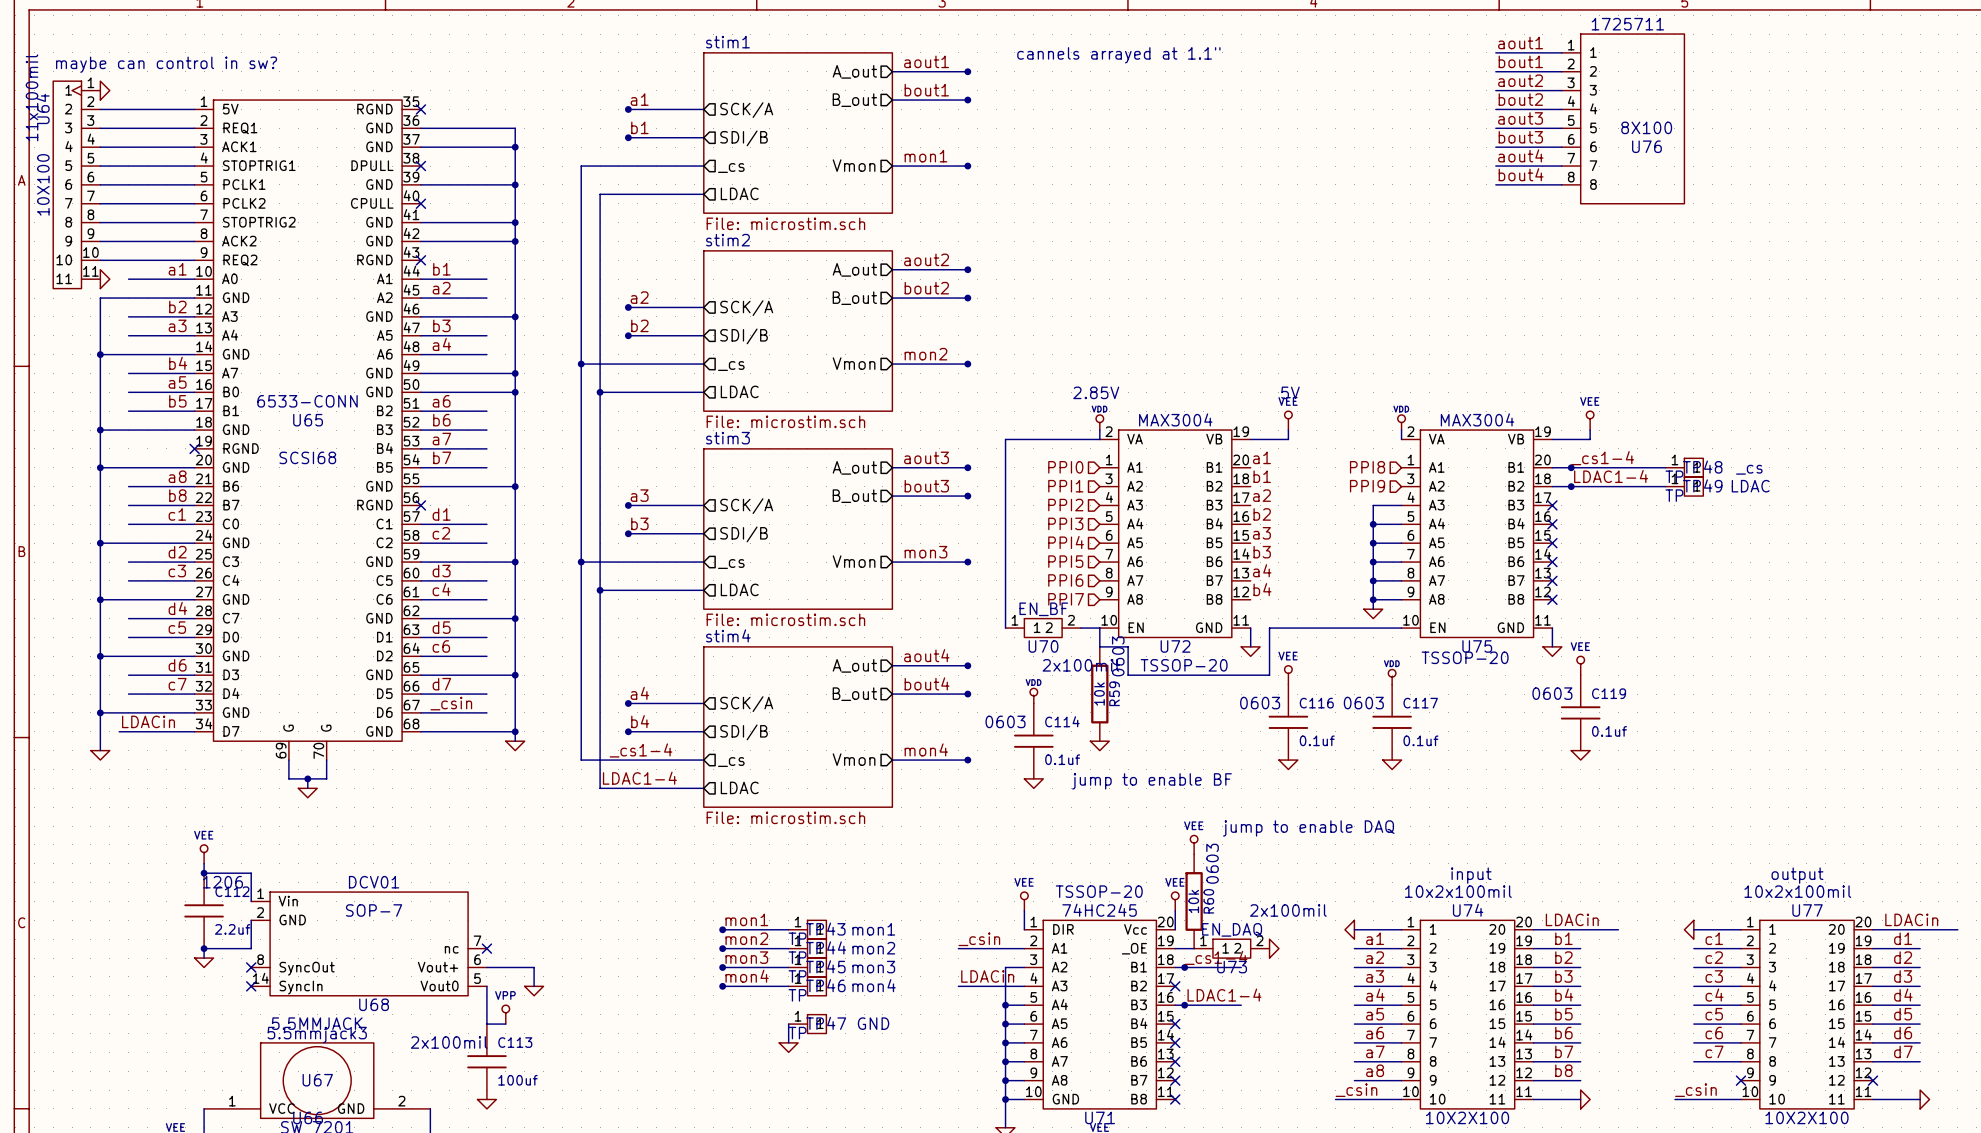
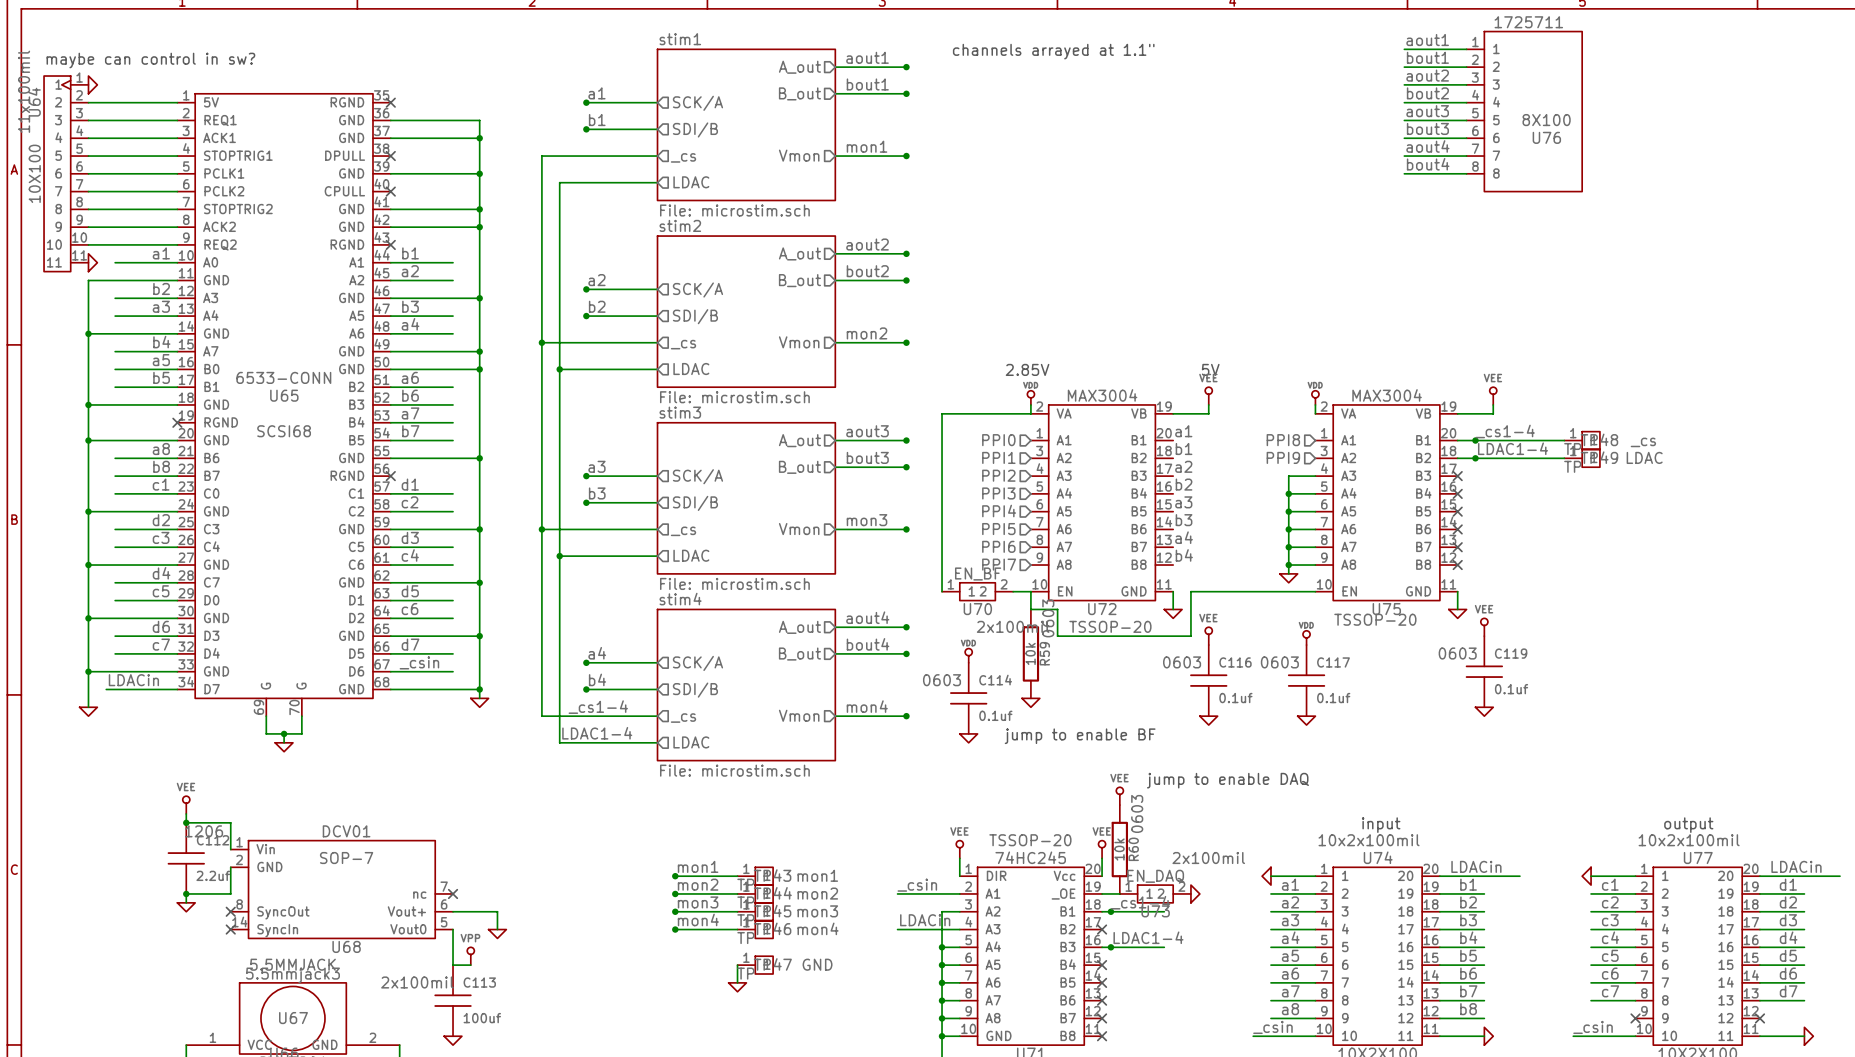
text: cannels arrayed at 1.1" (1118, 55) -> channels arrayed at 1.1" (1053, 51)

